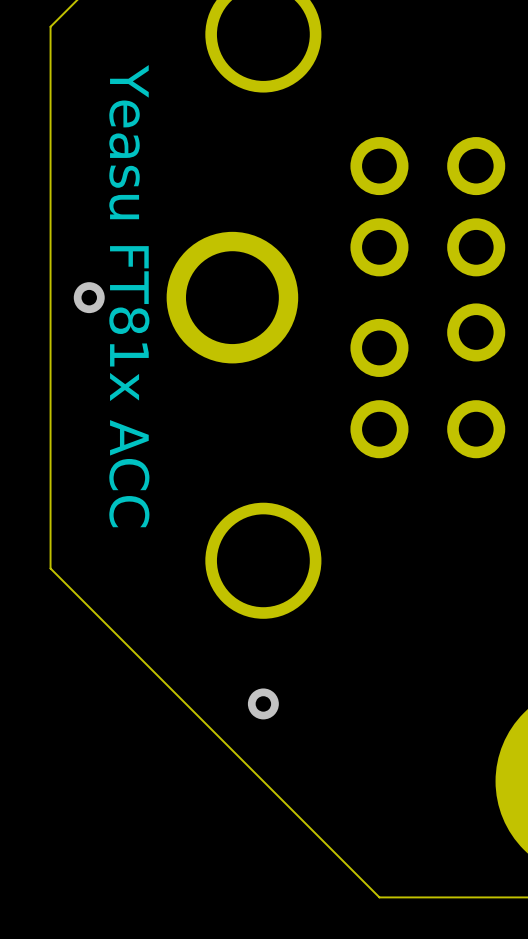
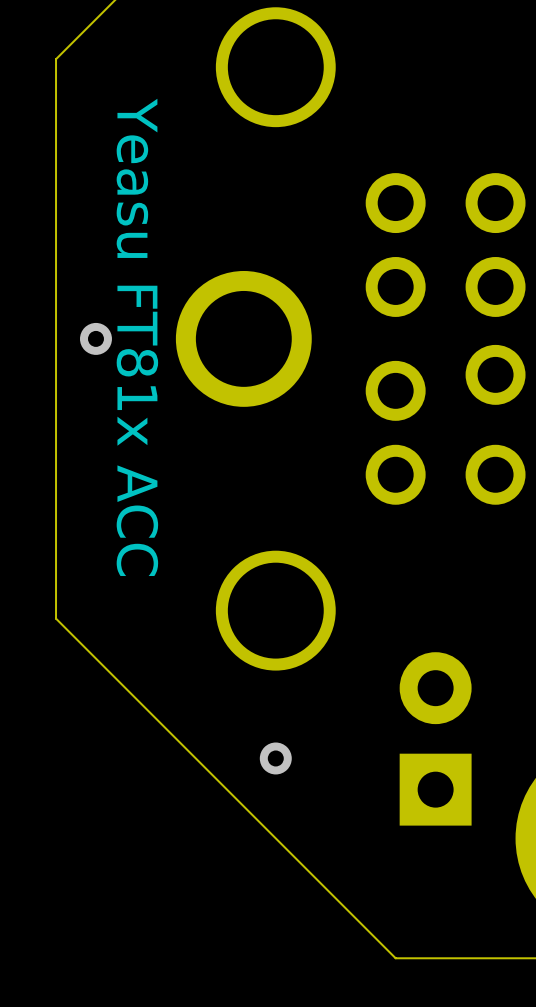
part: none -> (435, 738)

